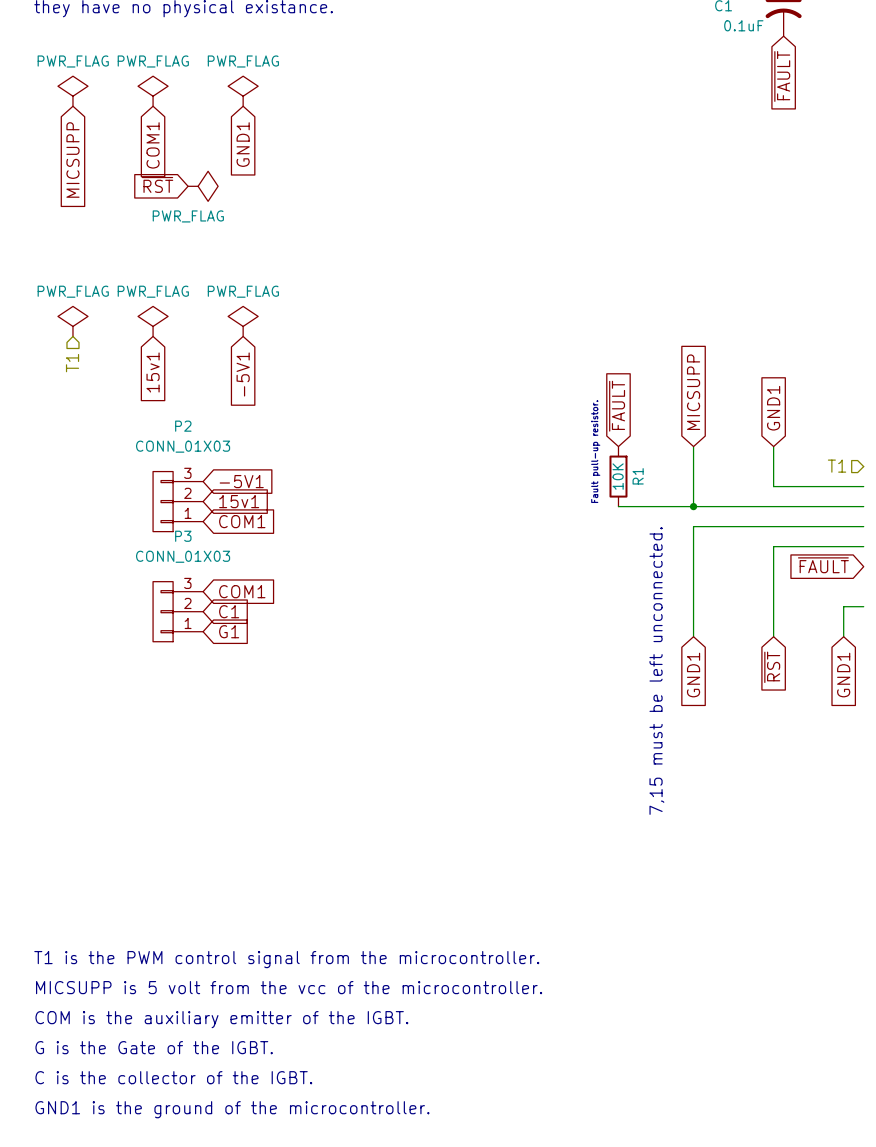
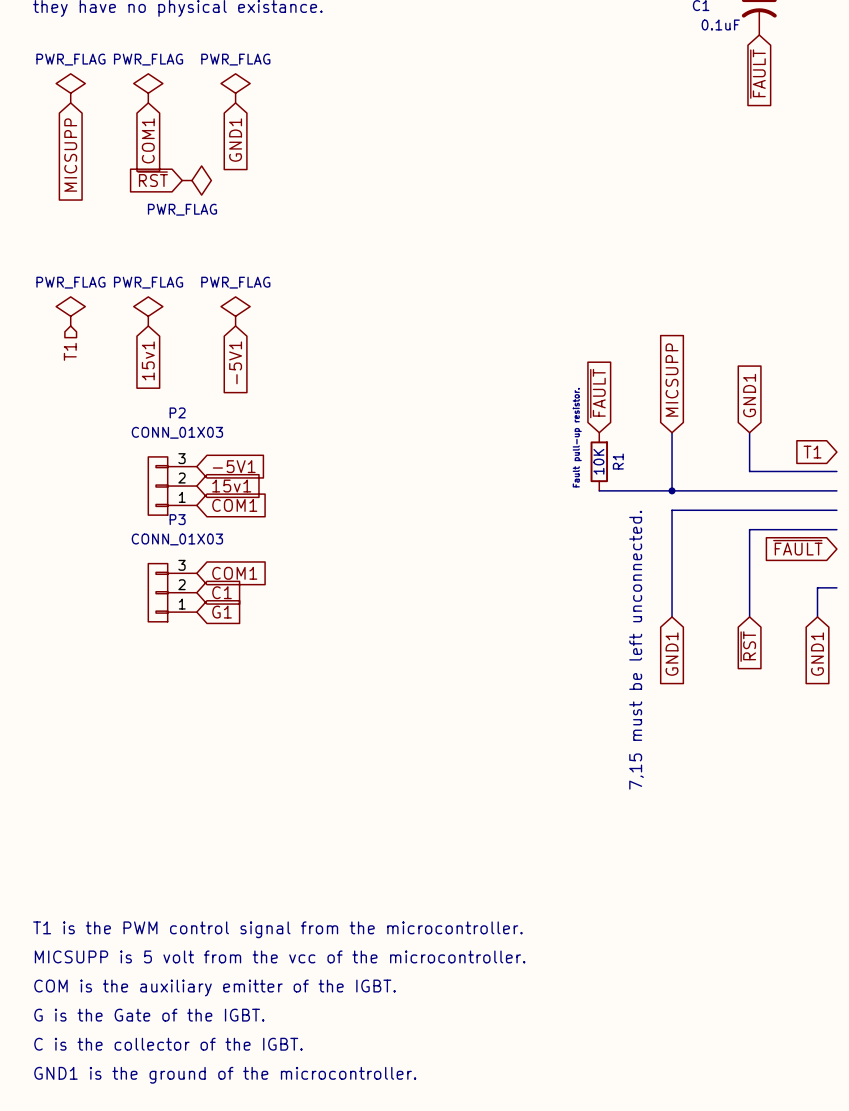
hierarchical label: T1 (837, 466) -> none
global label: none -> T1 (812, 452)

